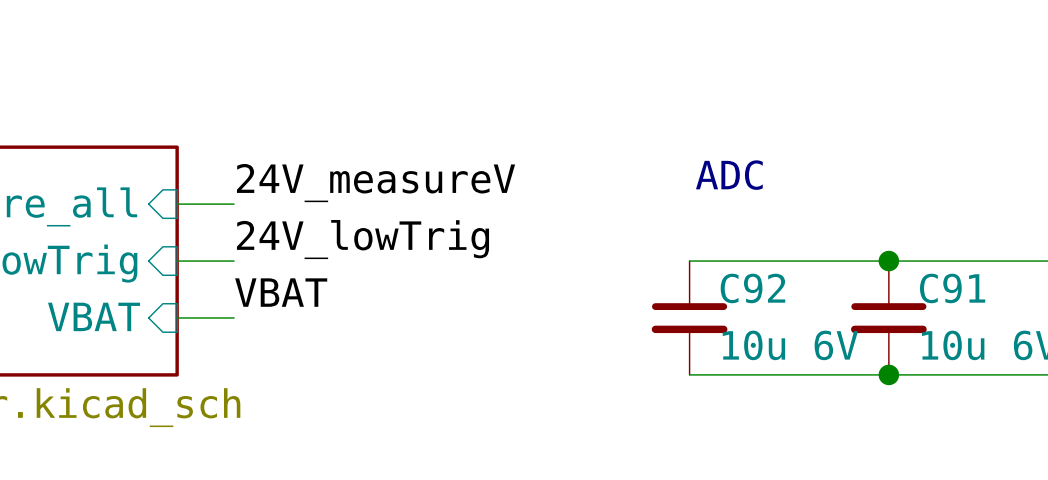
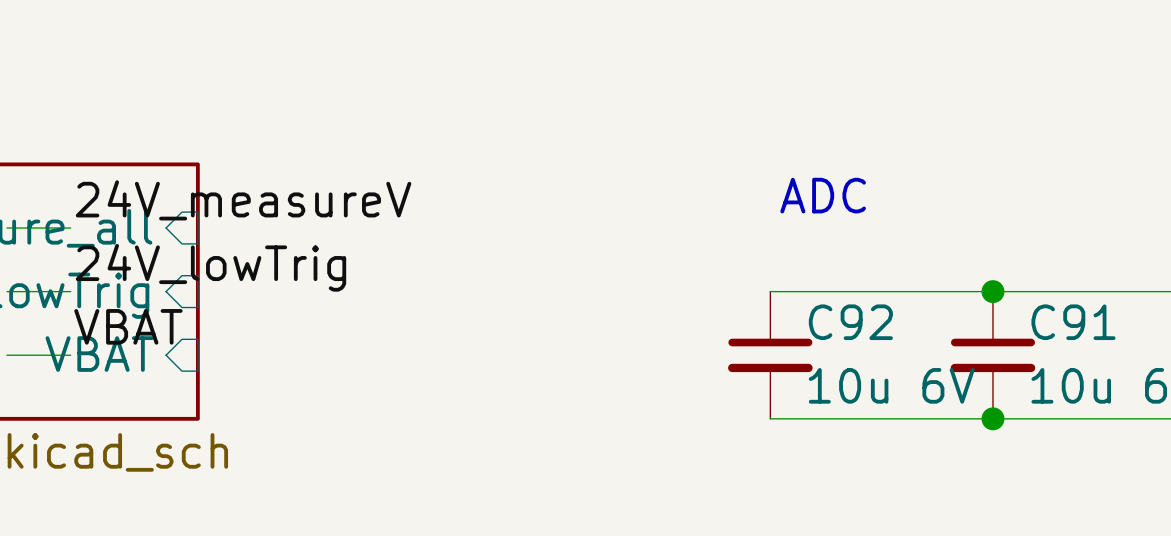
label position: 24V_measureV (376, 183) -> 24V_measureV (243, 200)
wire: (177, 204) (234, 204) -> (7, 228) (70, 228)
label position: 24V_lowTrig (363, 239) -> 24V_lowTrig (210, 267)
wire: (177, 261) (234, 261) -> (7, 291) (70, 291)
label position: VBAT (281, 292) -> VBAT (128, 326)
wire: (177, 317) (234, 317) -> (7, 355) (70, 355)

